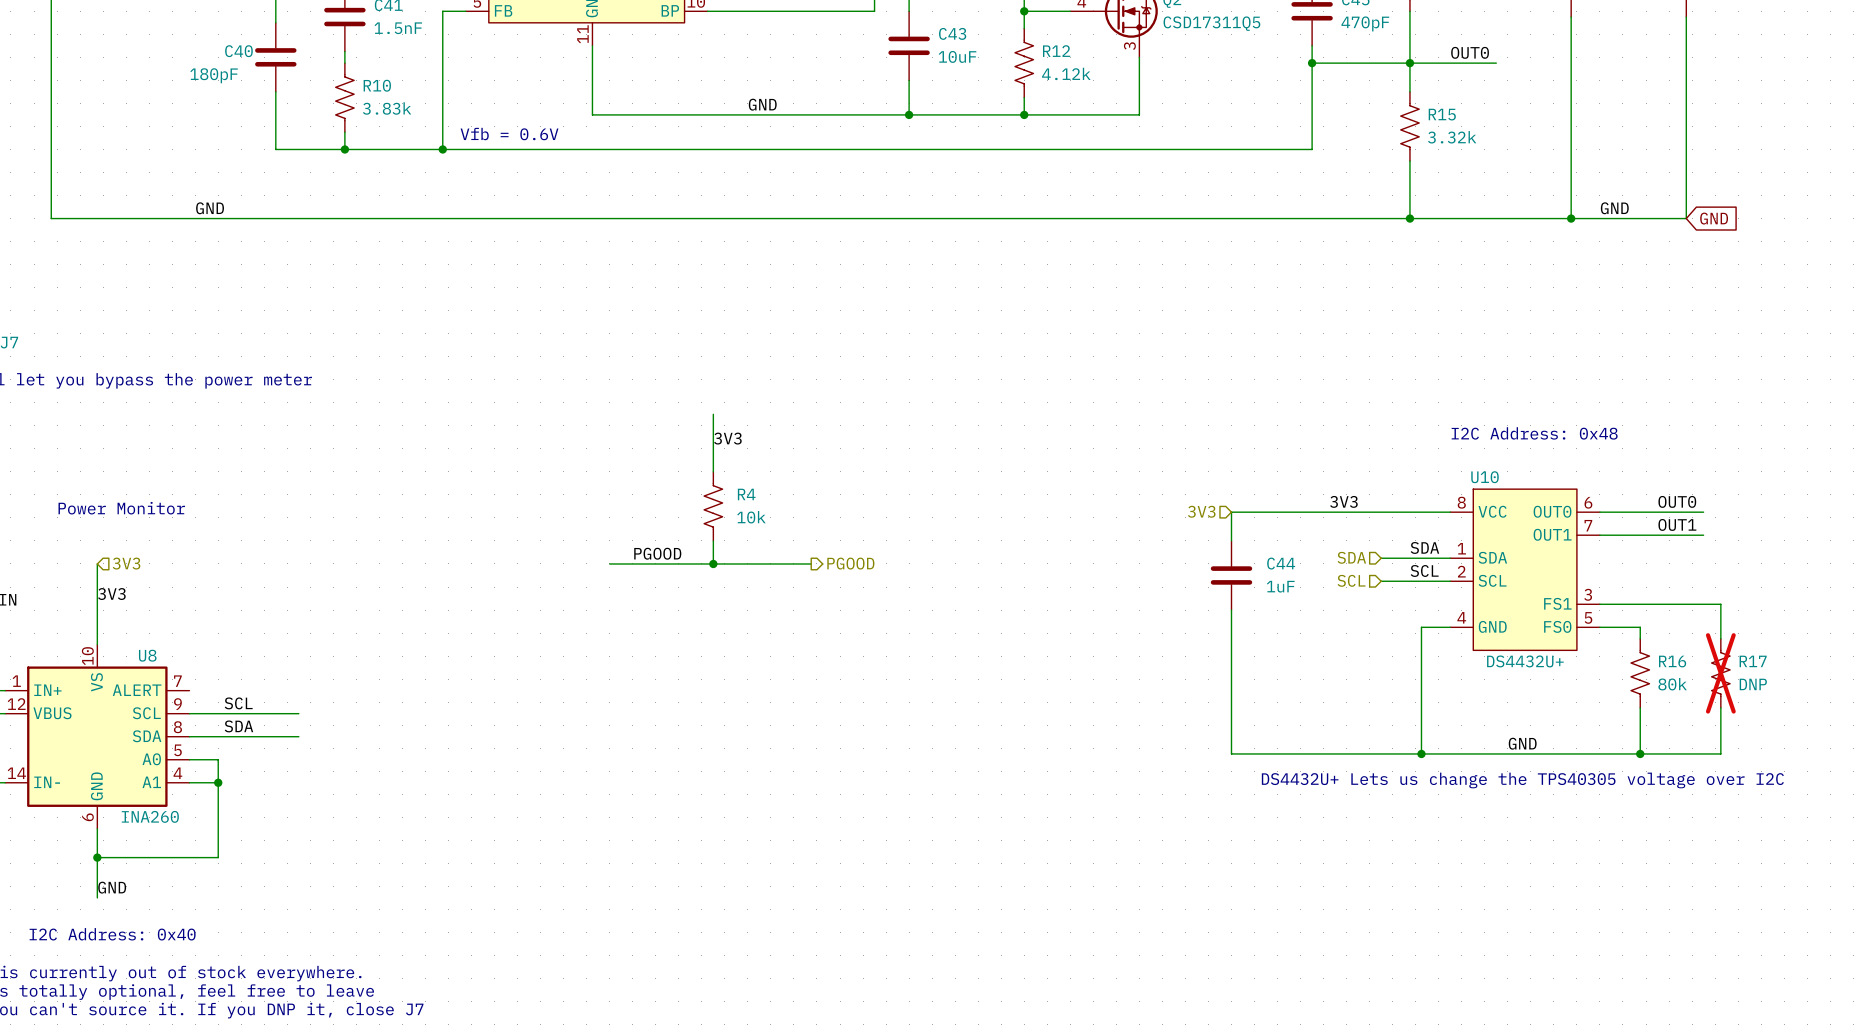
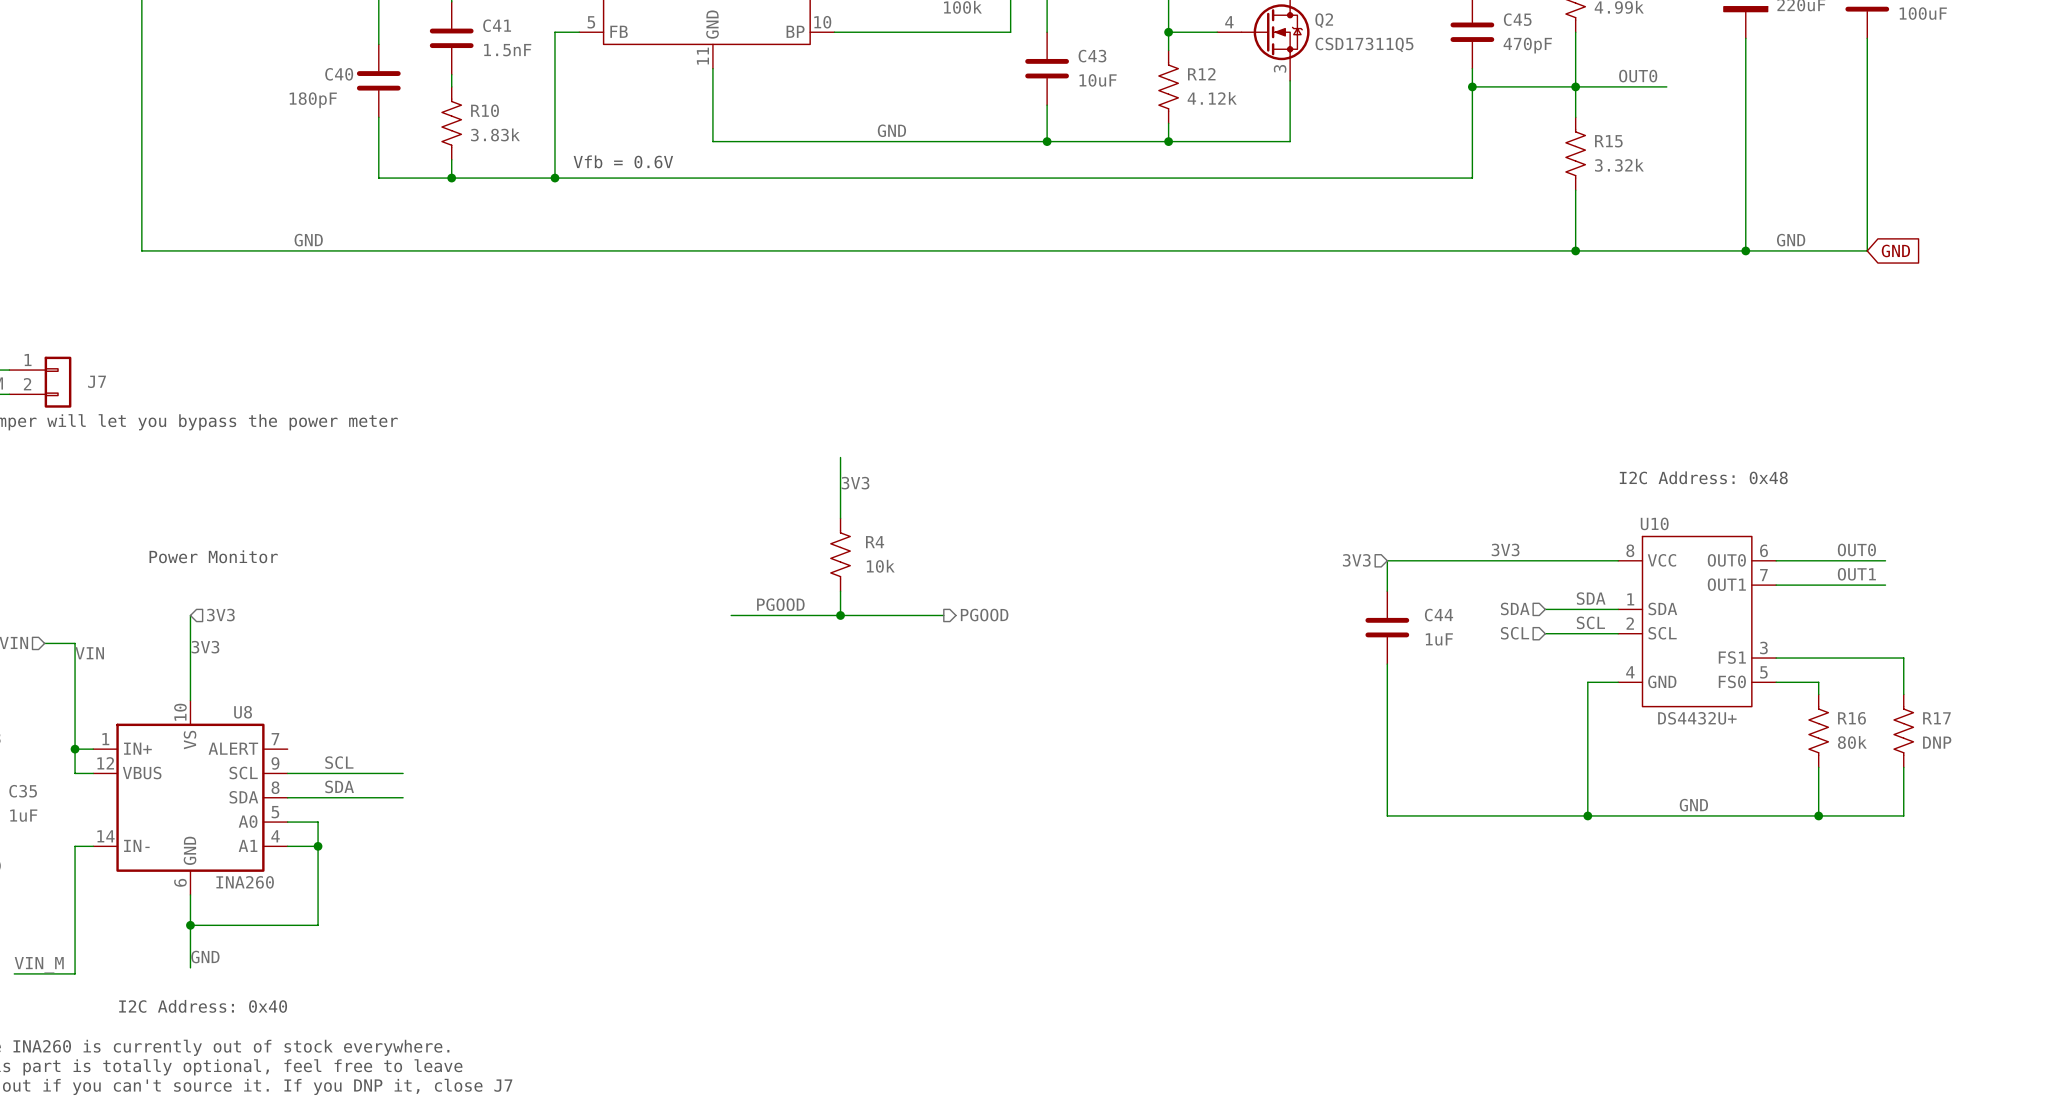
R17 do-not-place cross: (1720, 673) -> none
text: DS4432U+ Lets us change the TPS40305 voltage over I2C (1522, 780) -> none

